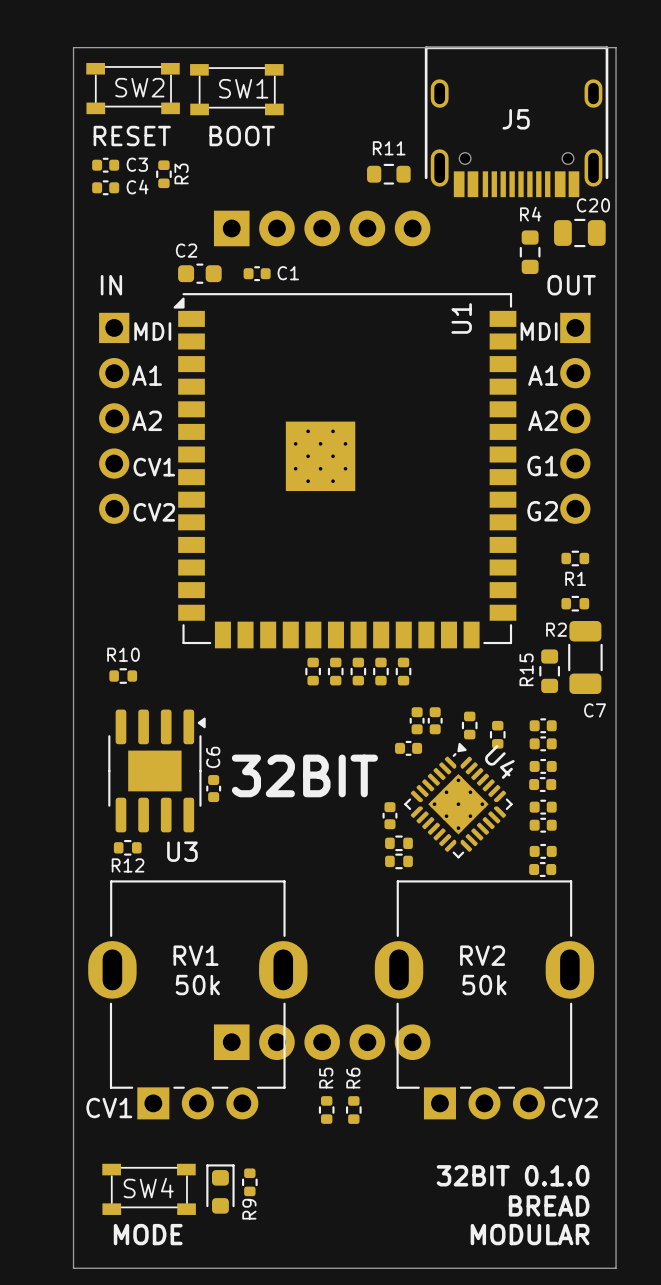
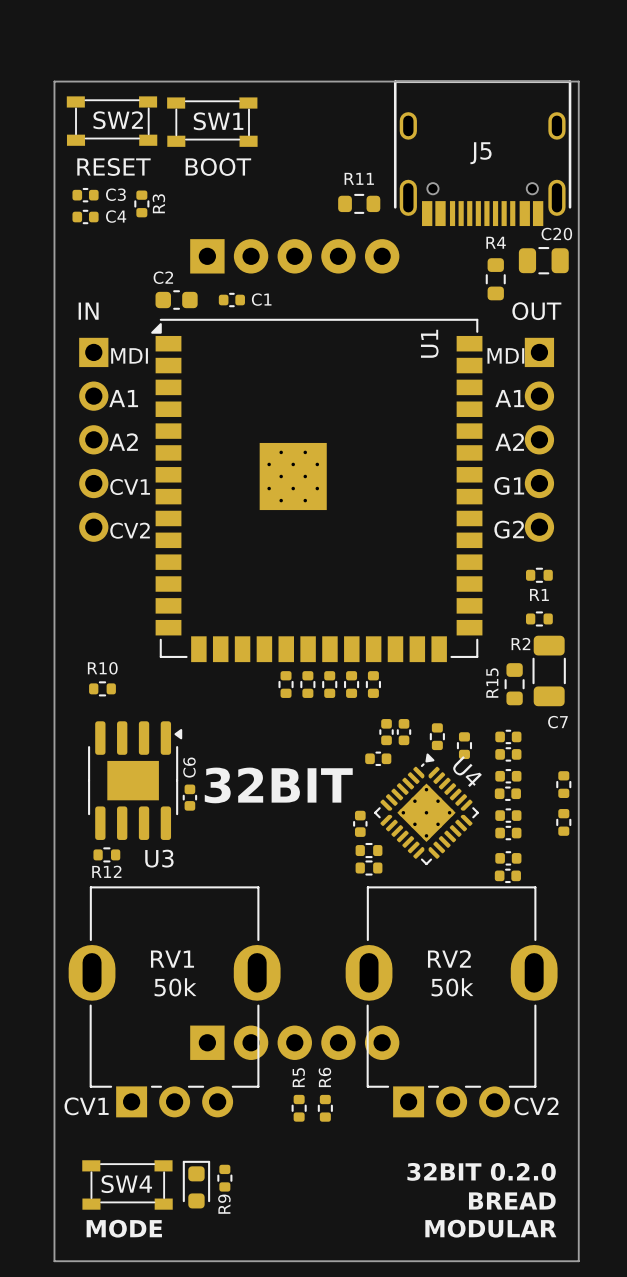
part: none -> (563, 784)
part: none -> (563, 822)
text: 32BIT 0.1.0 (513, 1175) -> 32BIT 0.2.0 (481, 1171)

